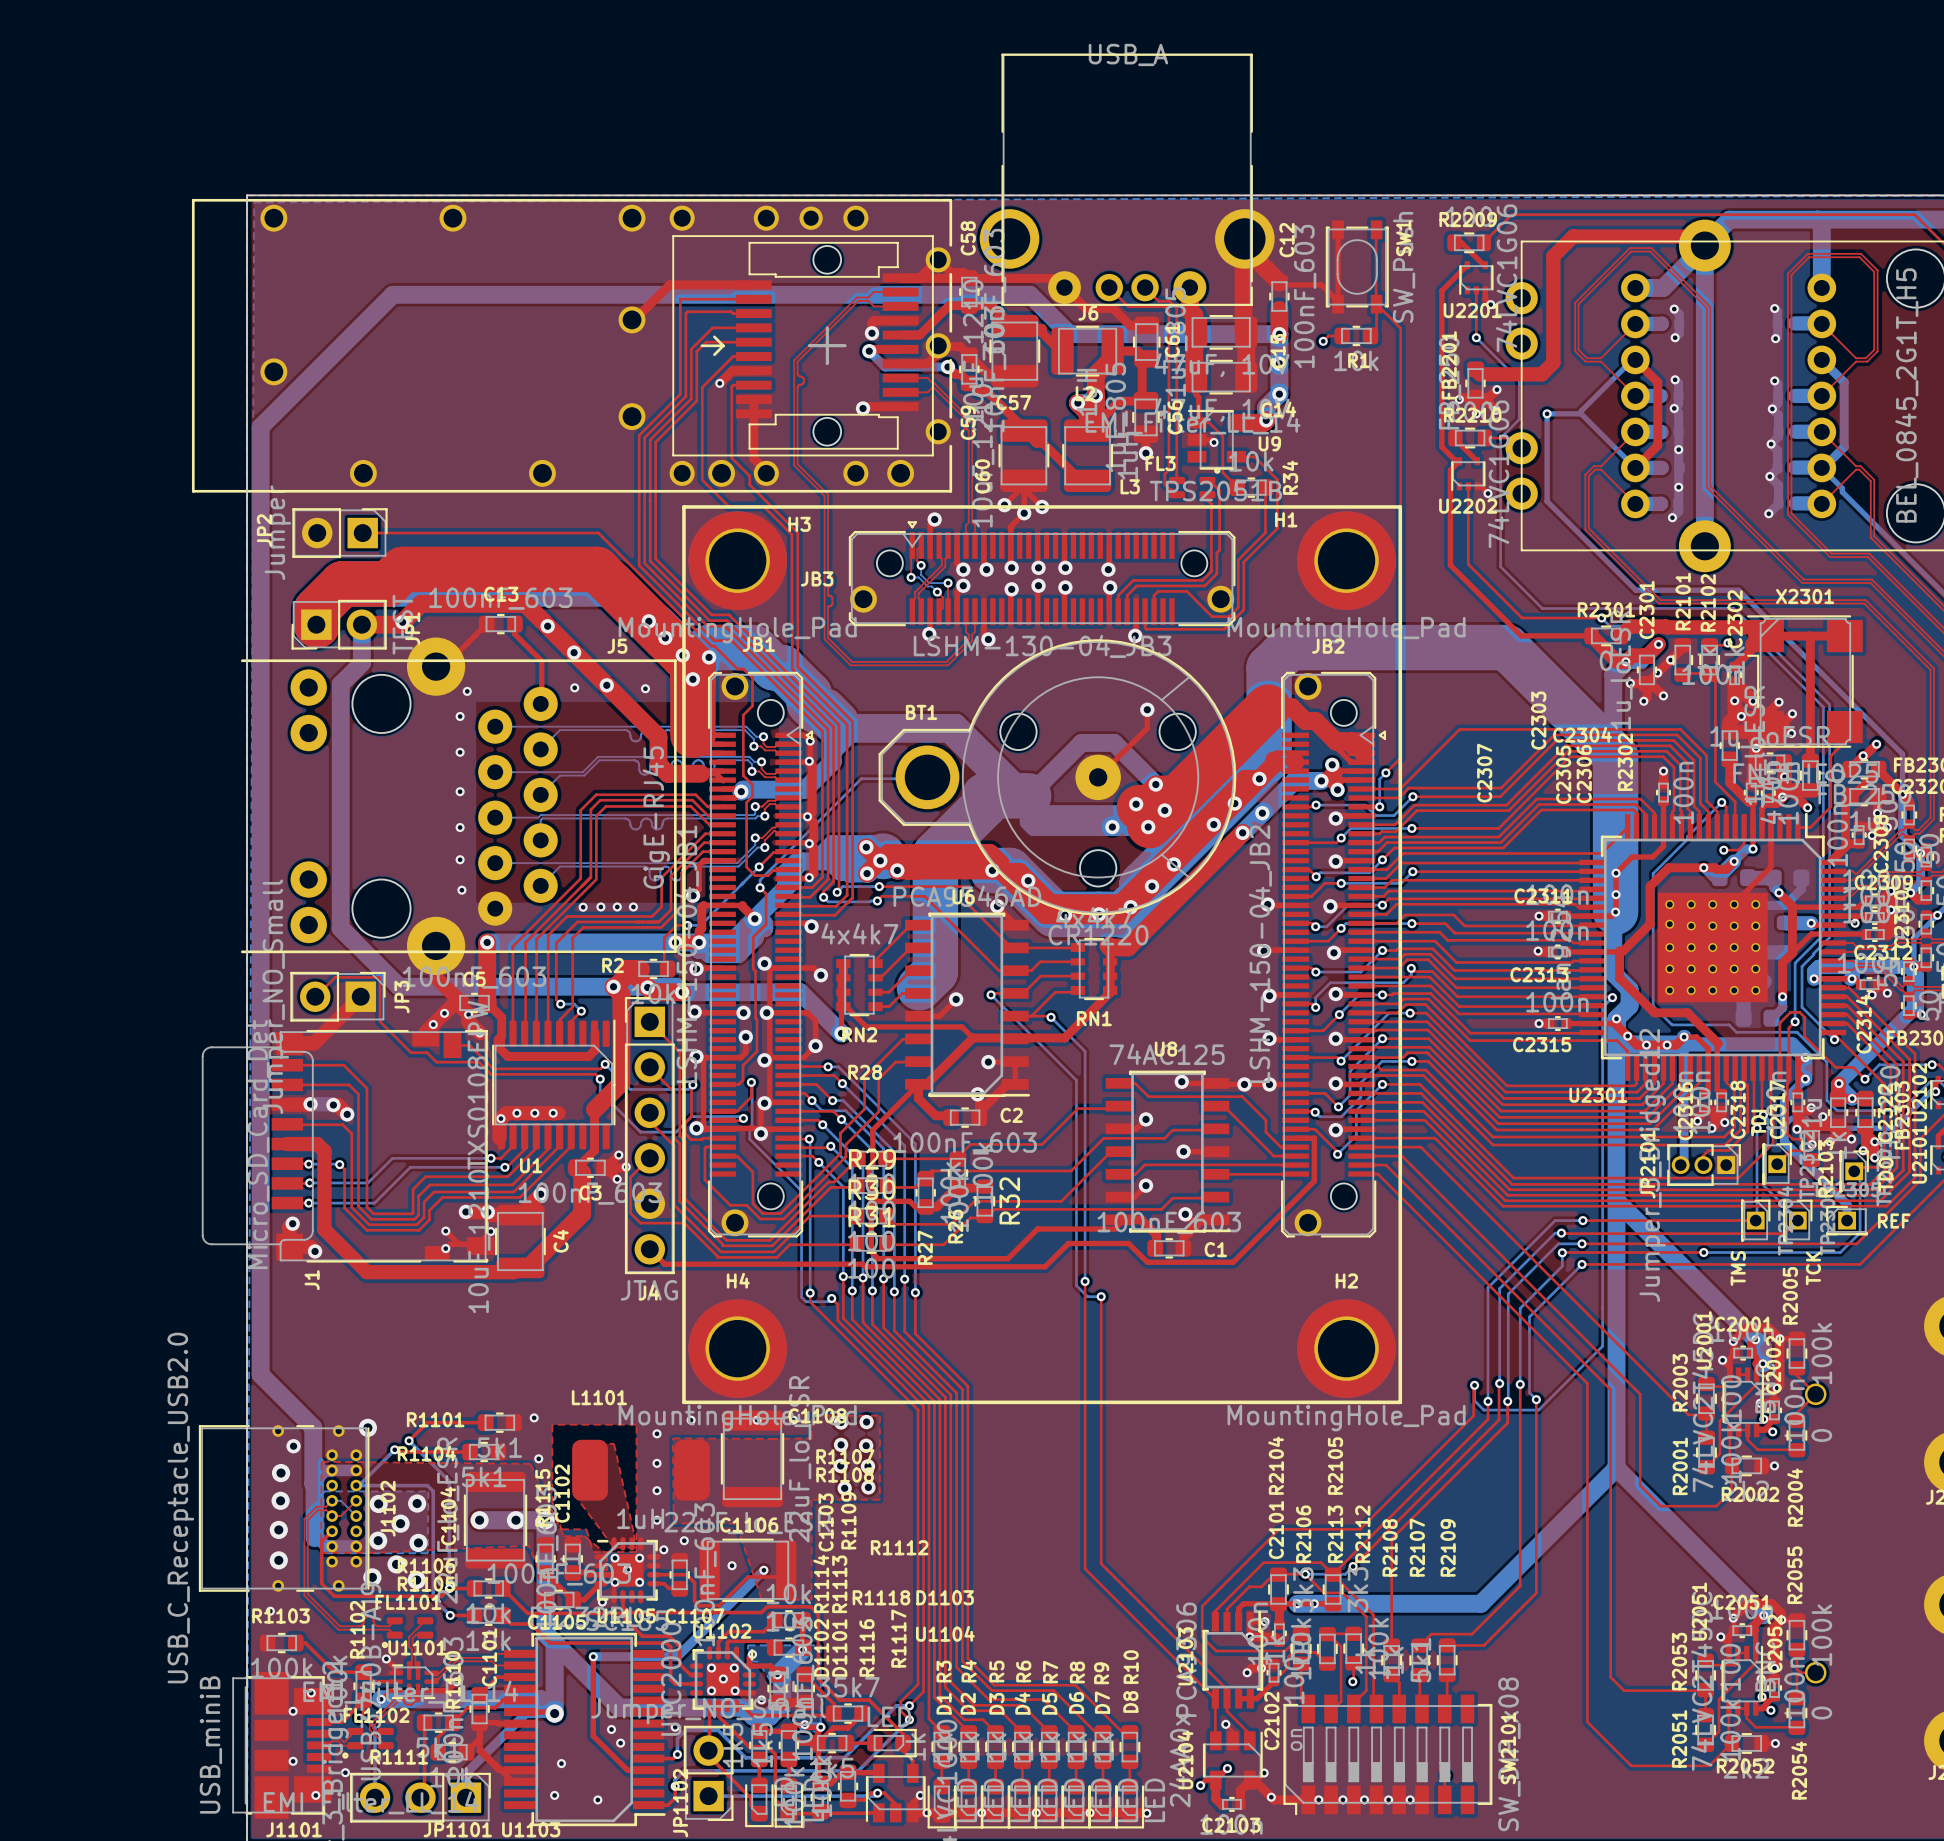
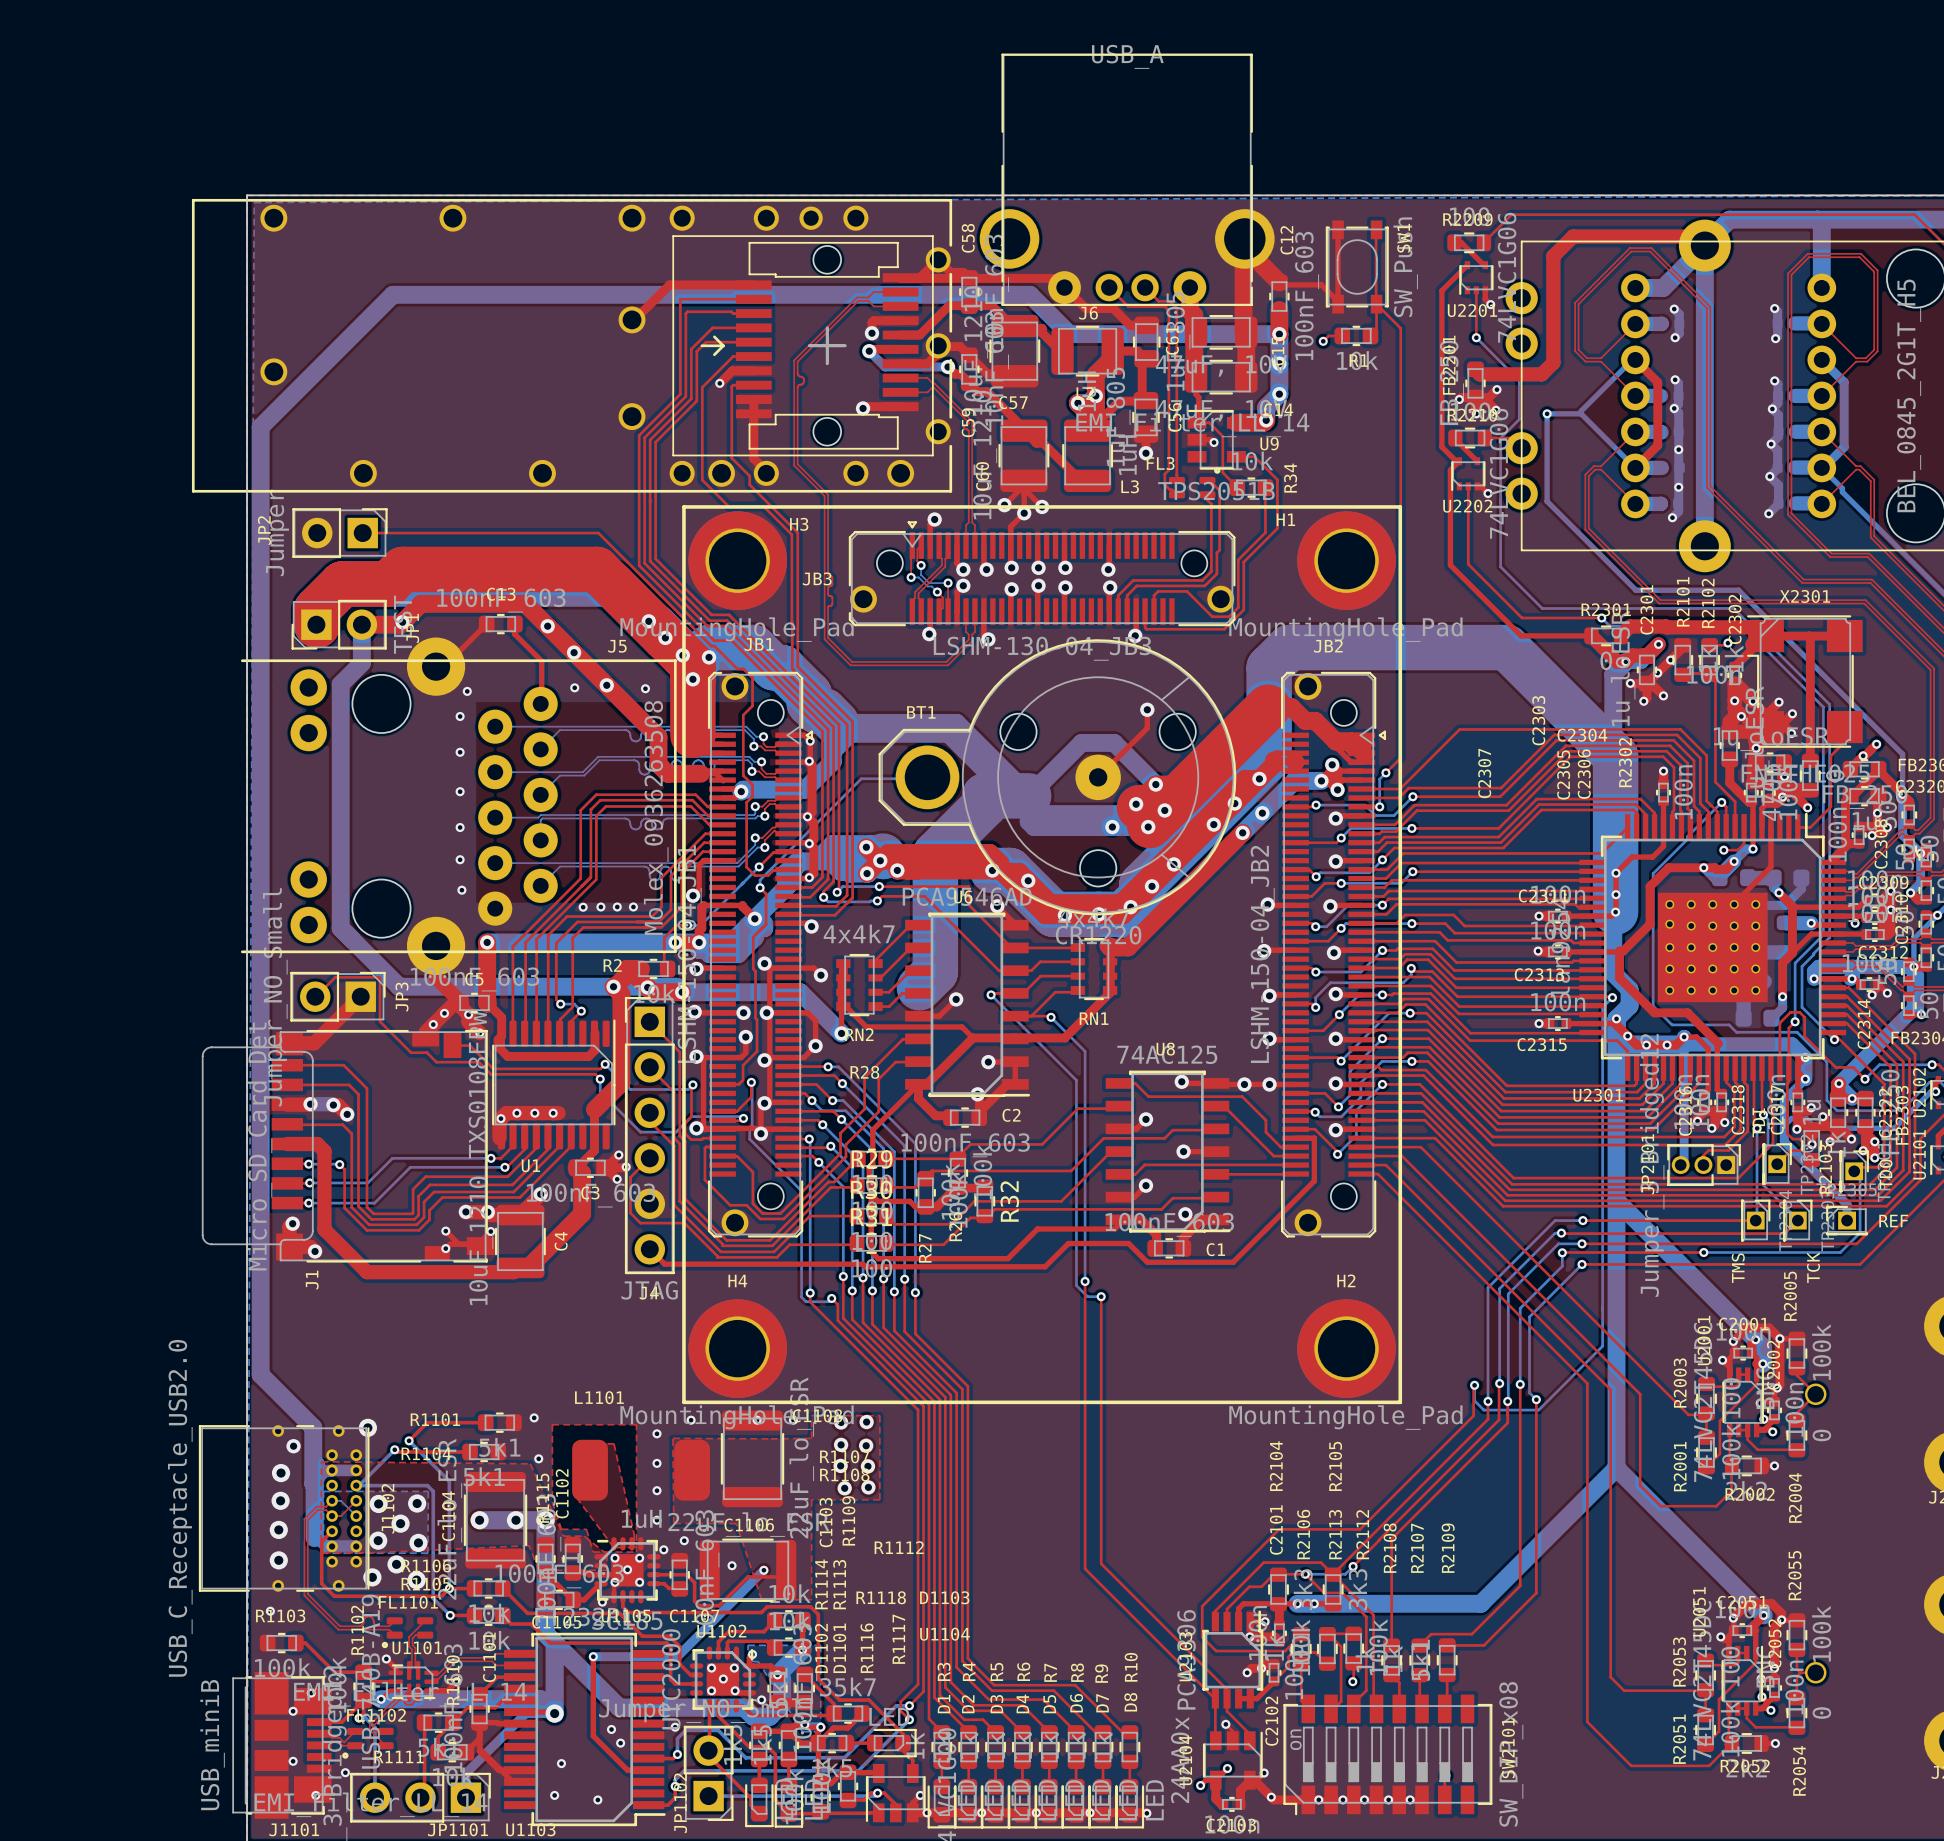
J5 value: GigE-RJ45 (656, 817) -> Molex_0936263508 (656, 817)

